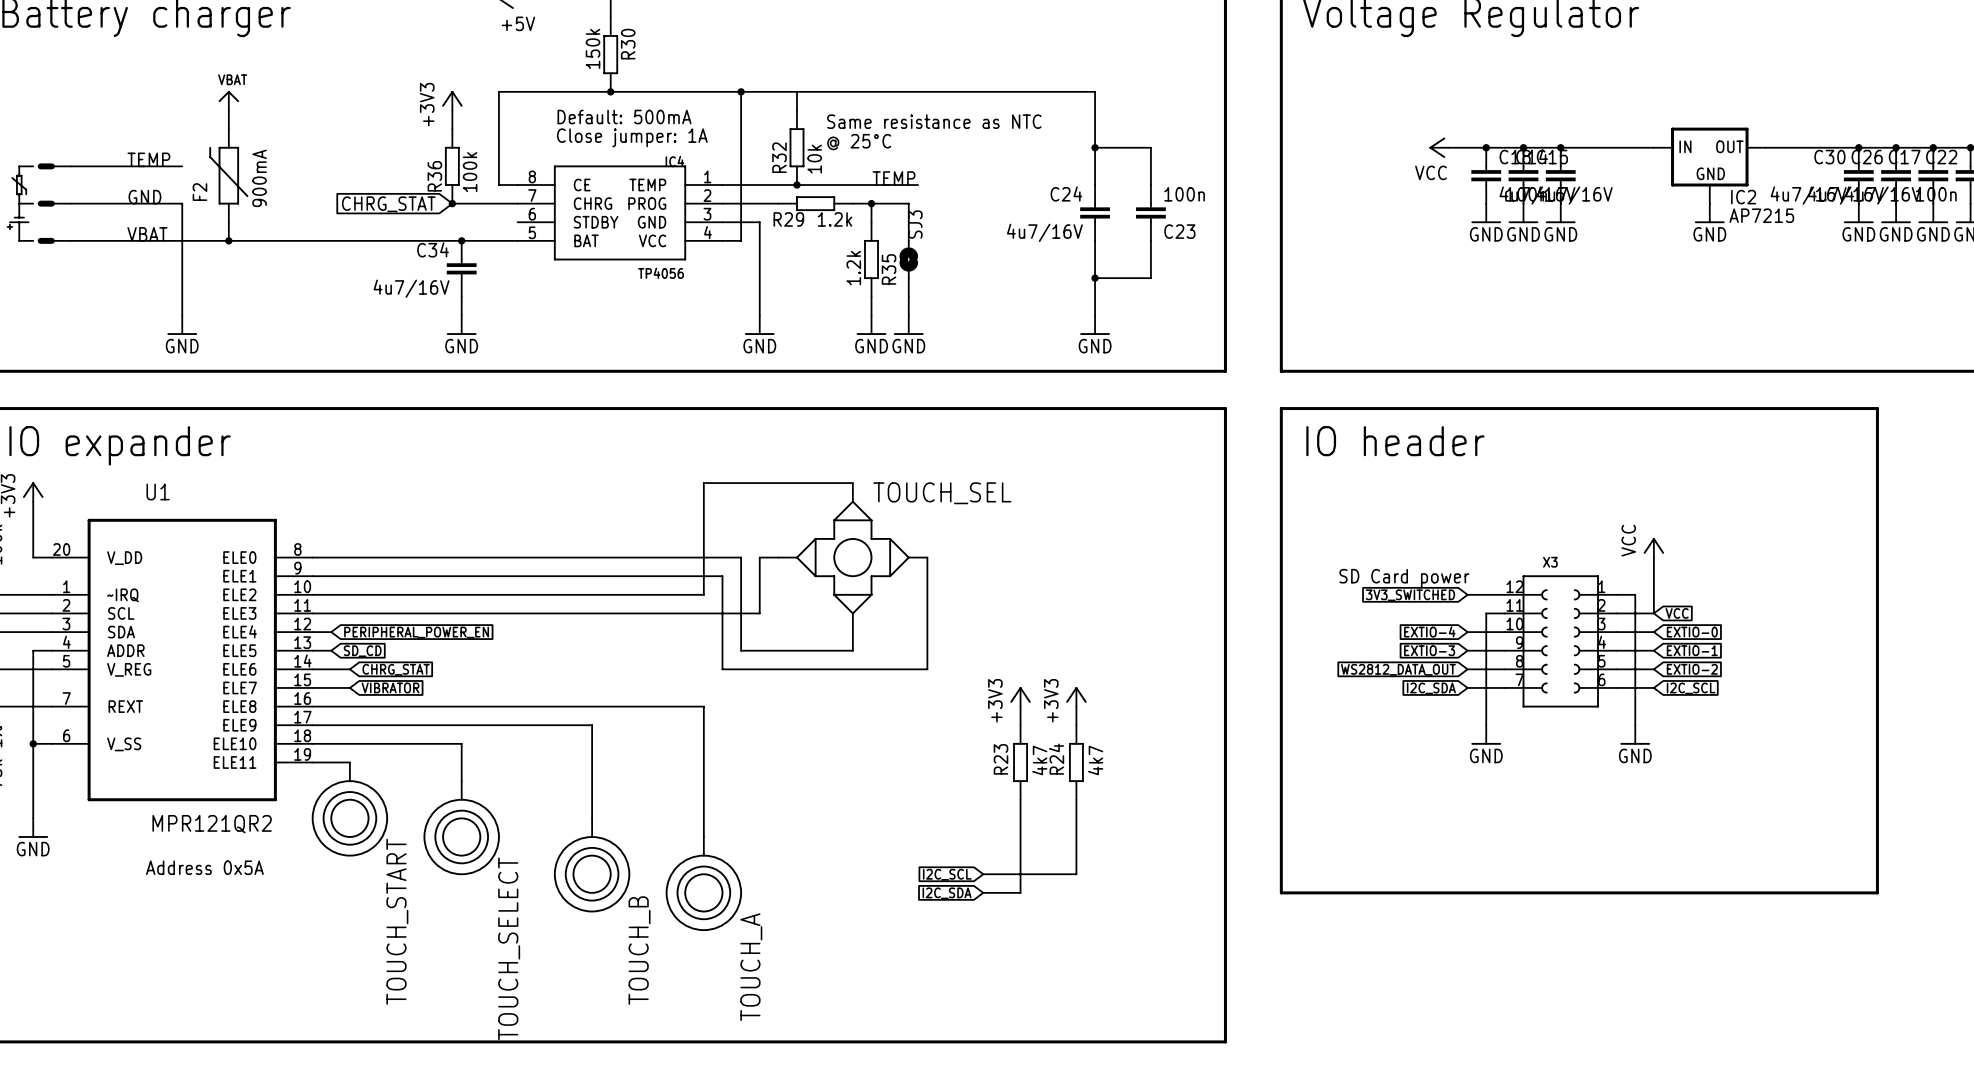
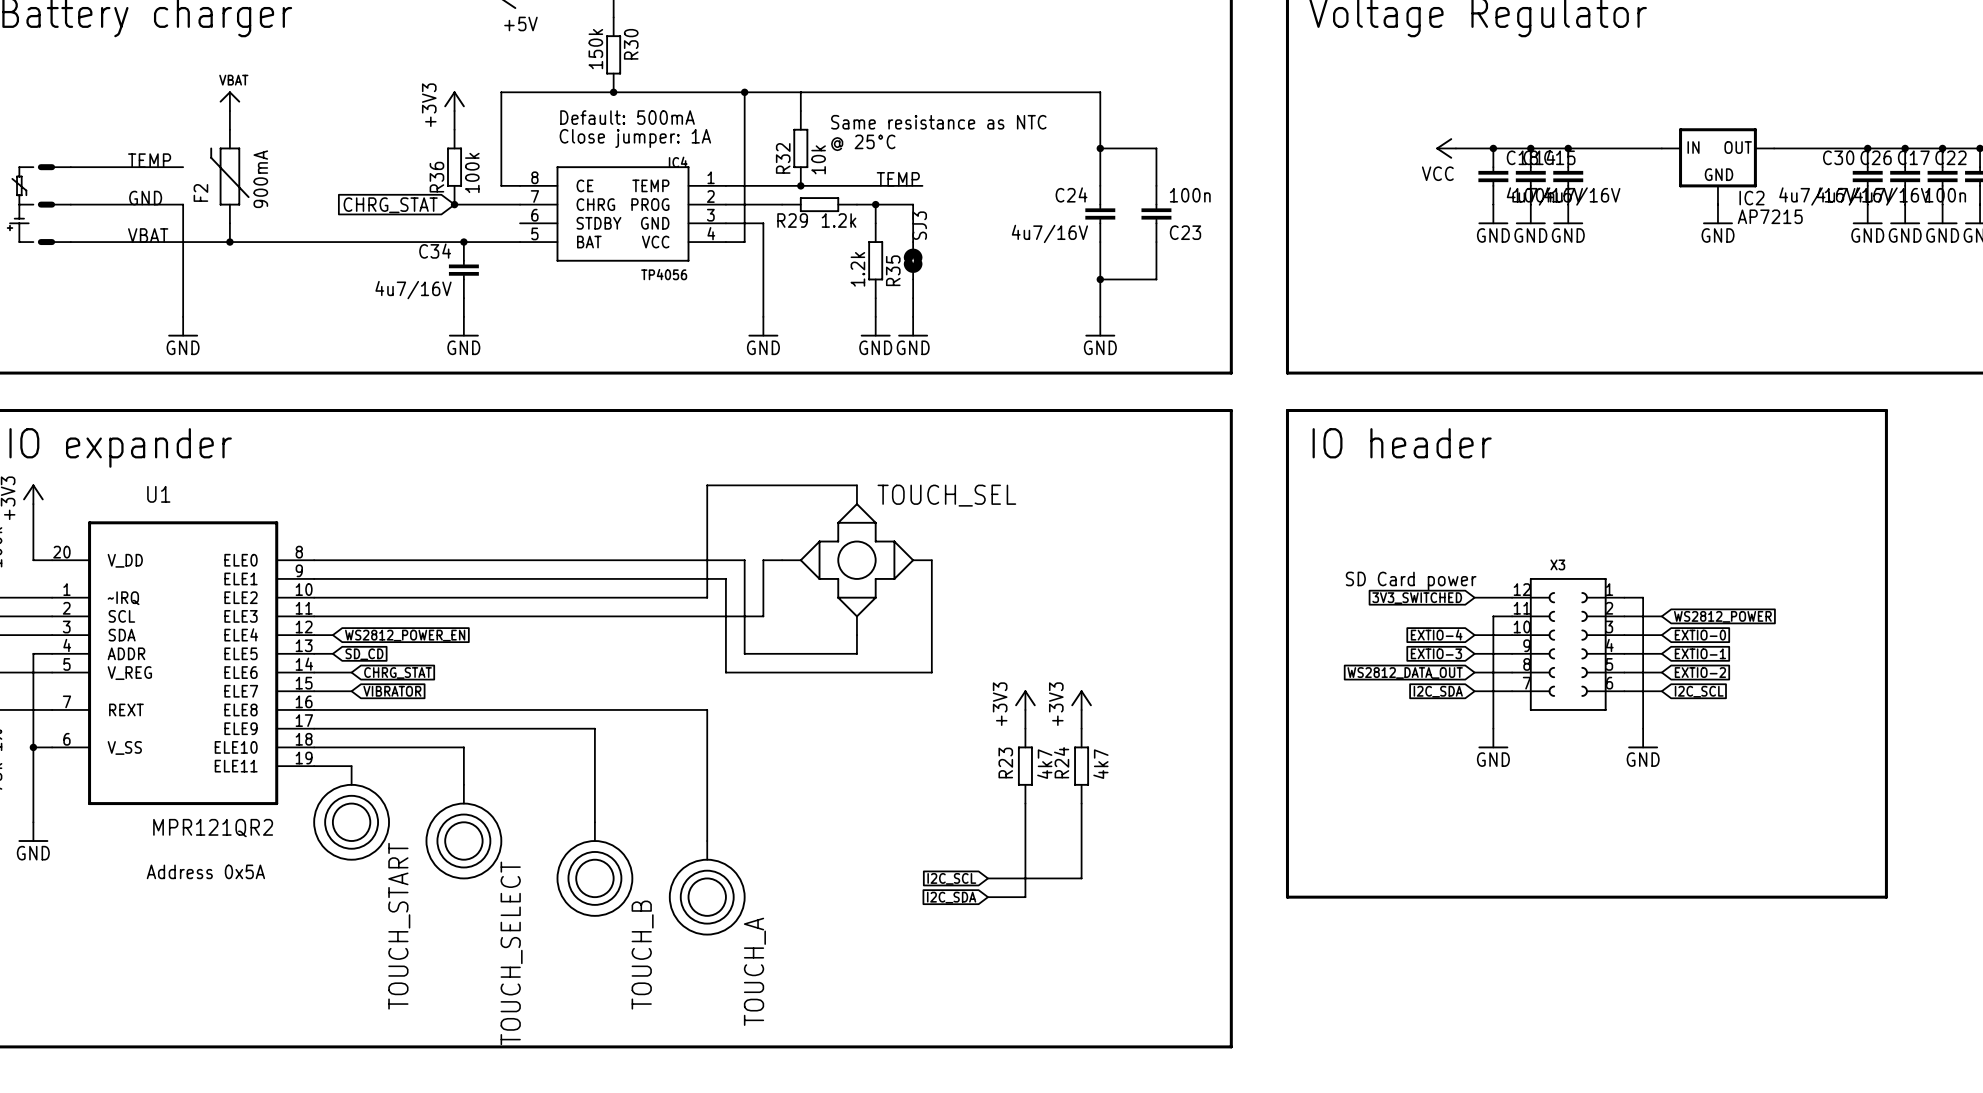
power symbol: VCC (1653, 547) -> none
wire: (1653, 557) (1653, 613) -> none
global label: VCC (1677, 613) -> WS2812_POWER (1722, 616)
global label: PERIPHERAL_POWER_EN (416, 632) -> WS2812_POWER_EN (405, 635)

